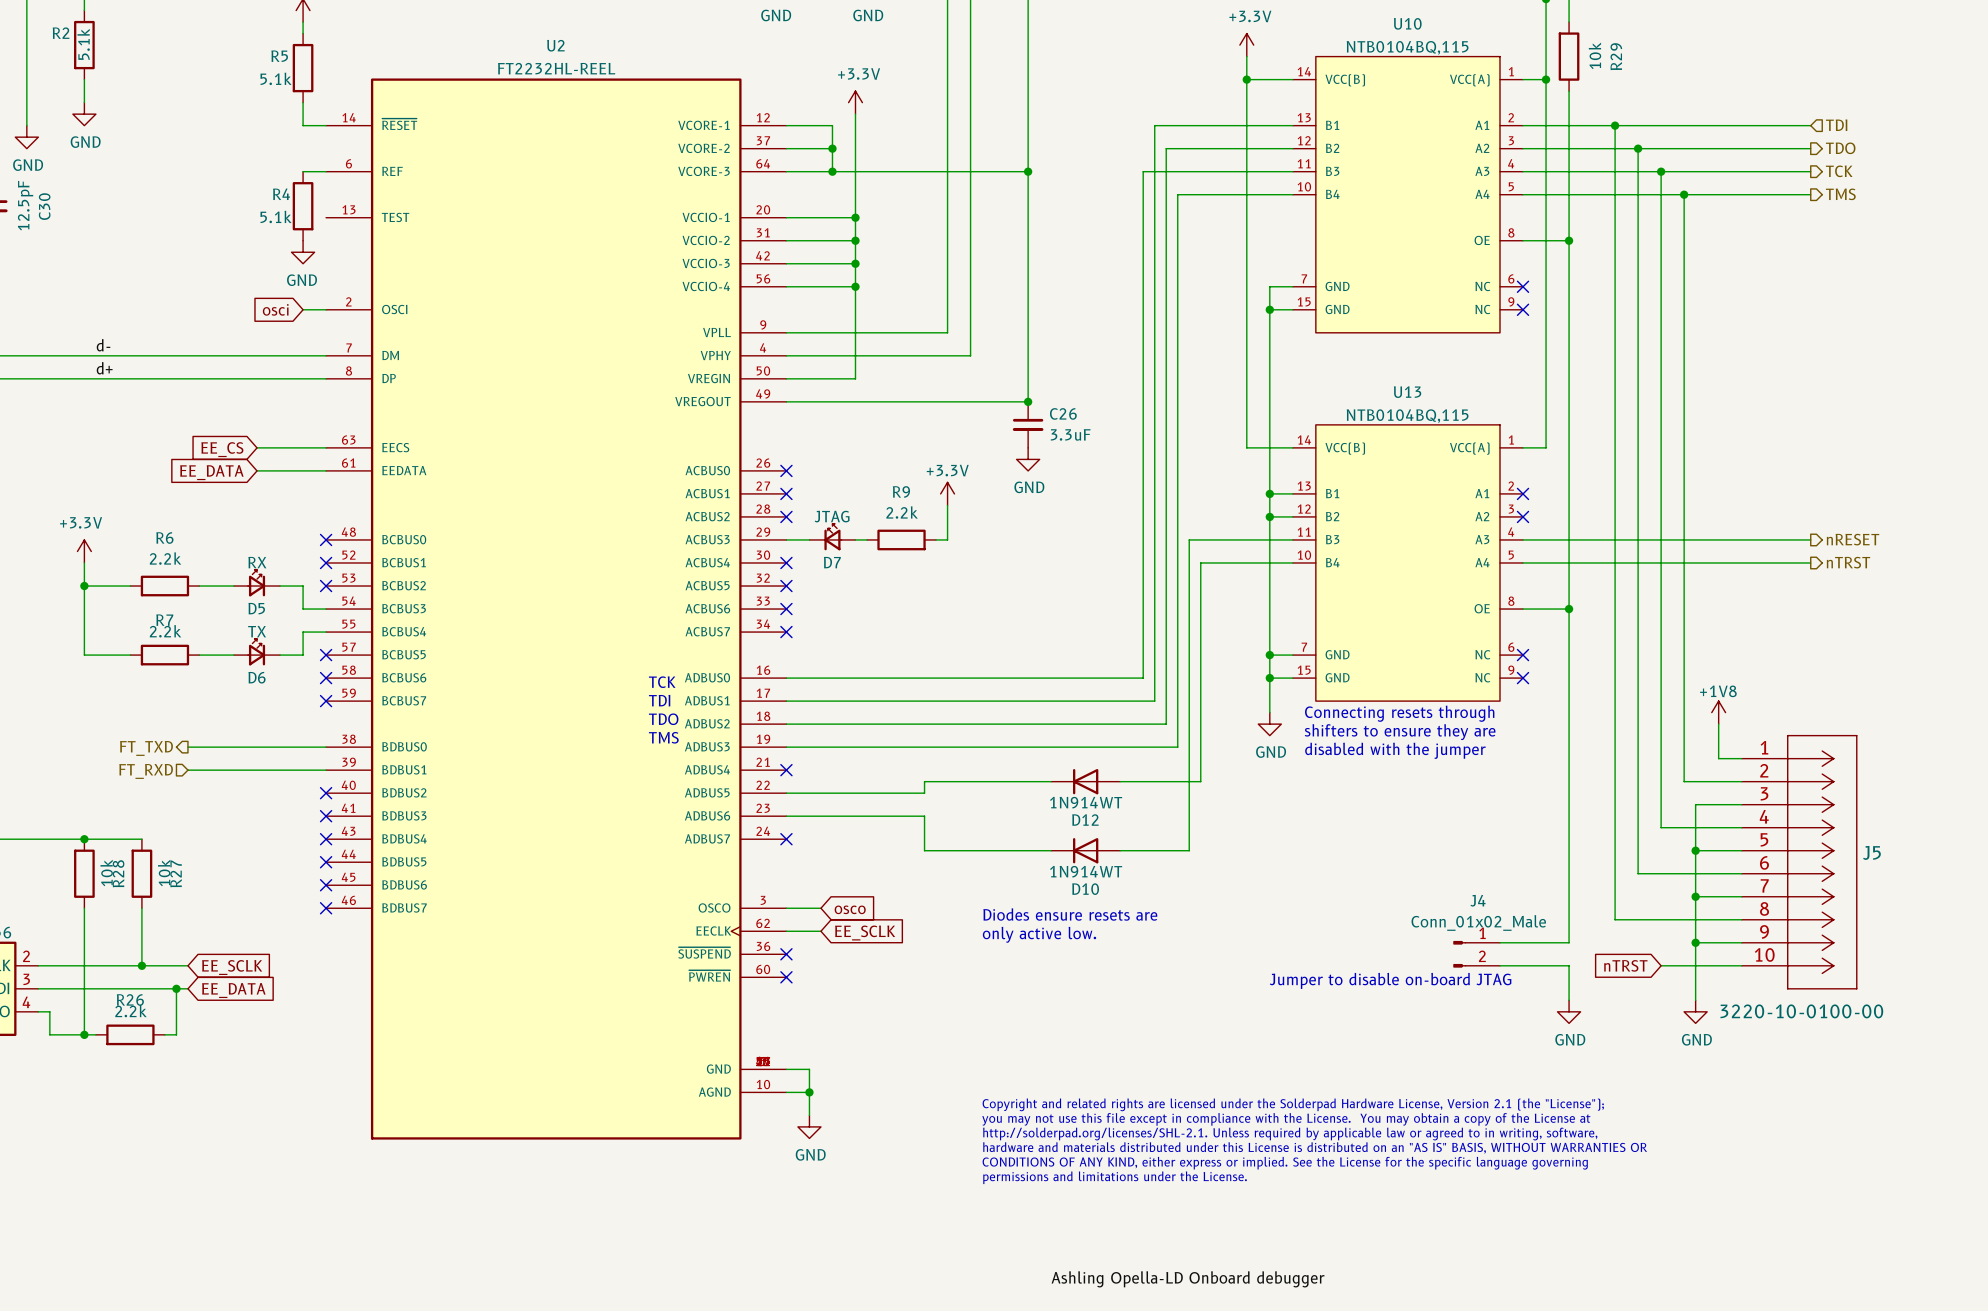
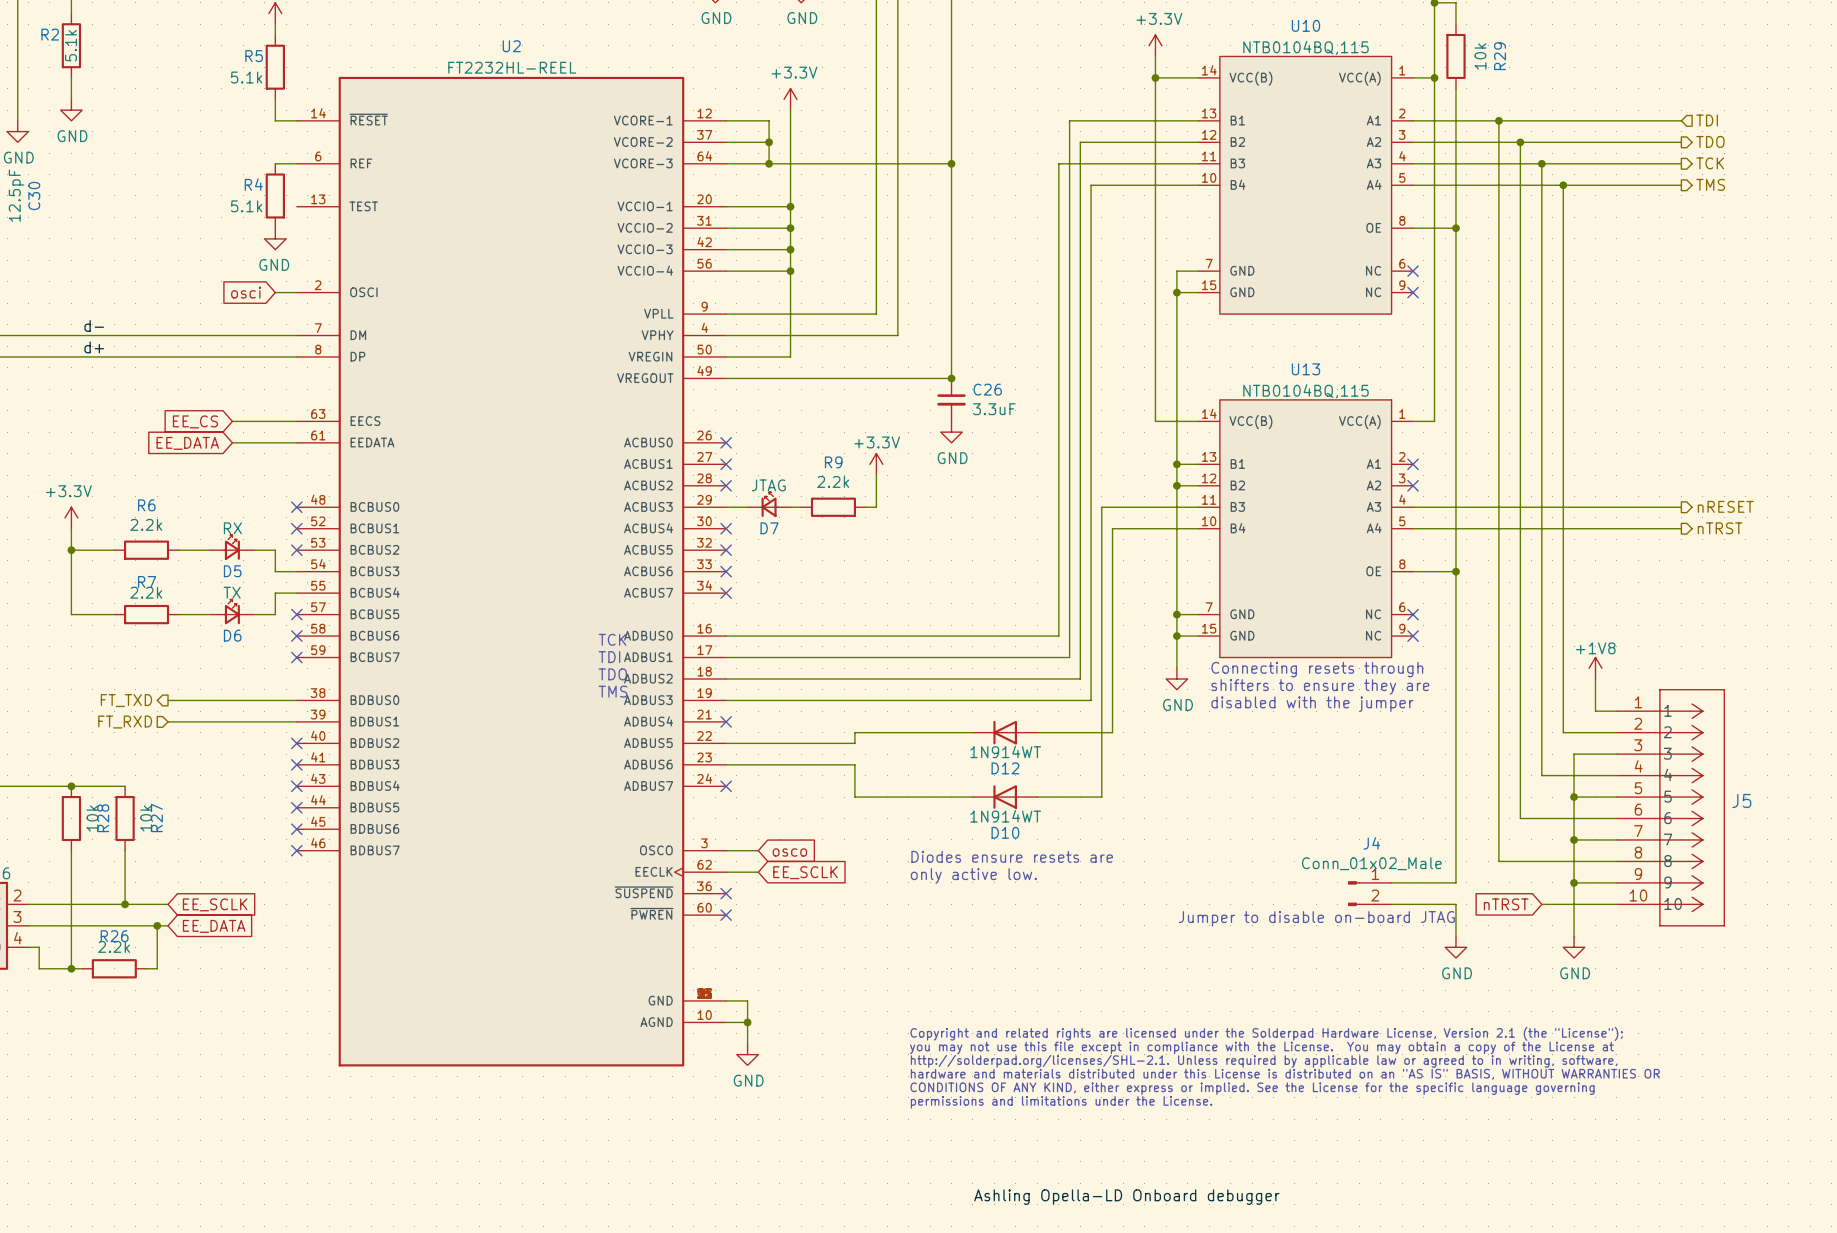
J5 symbol: [1741, 735, 1858, 990] -> [1616, 689, 1725, 927]
J5 value: 3220-10-0100-00 (1801, 1011) -> none

